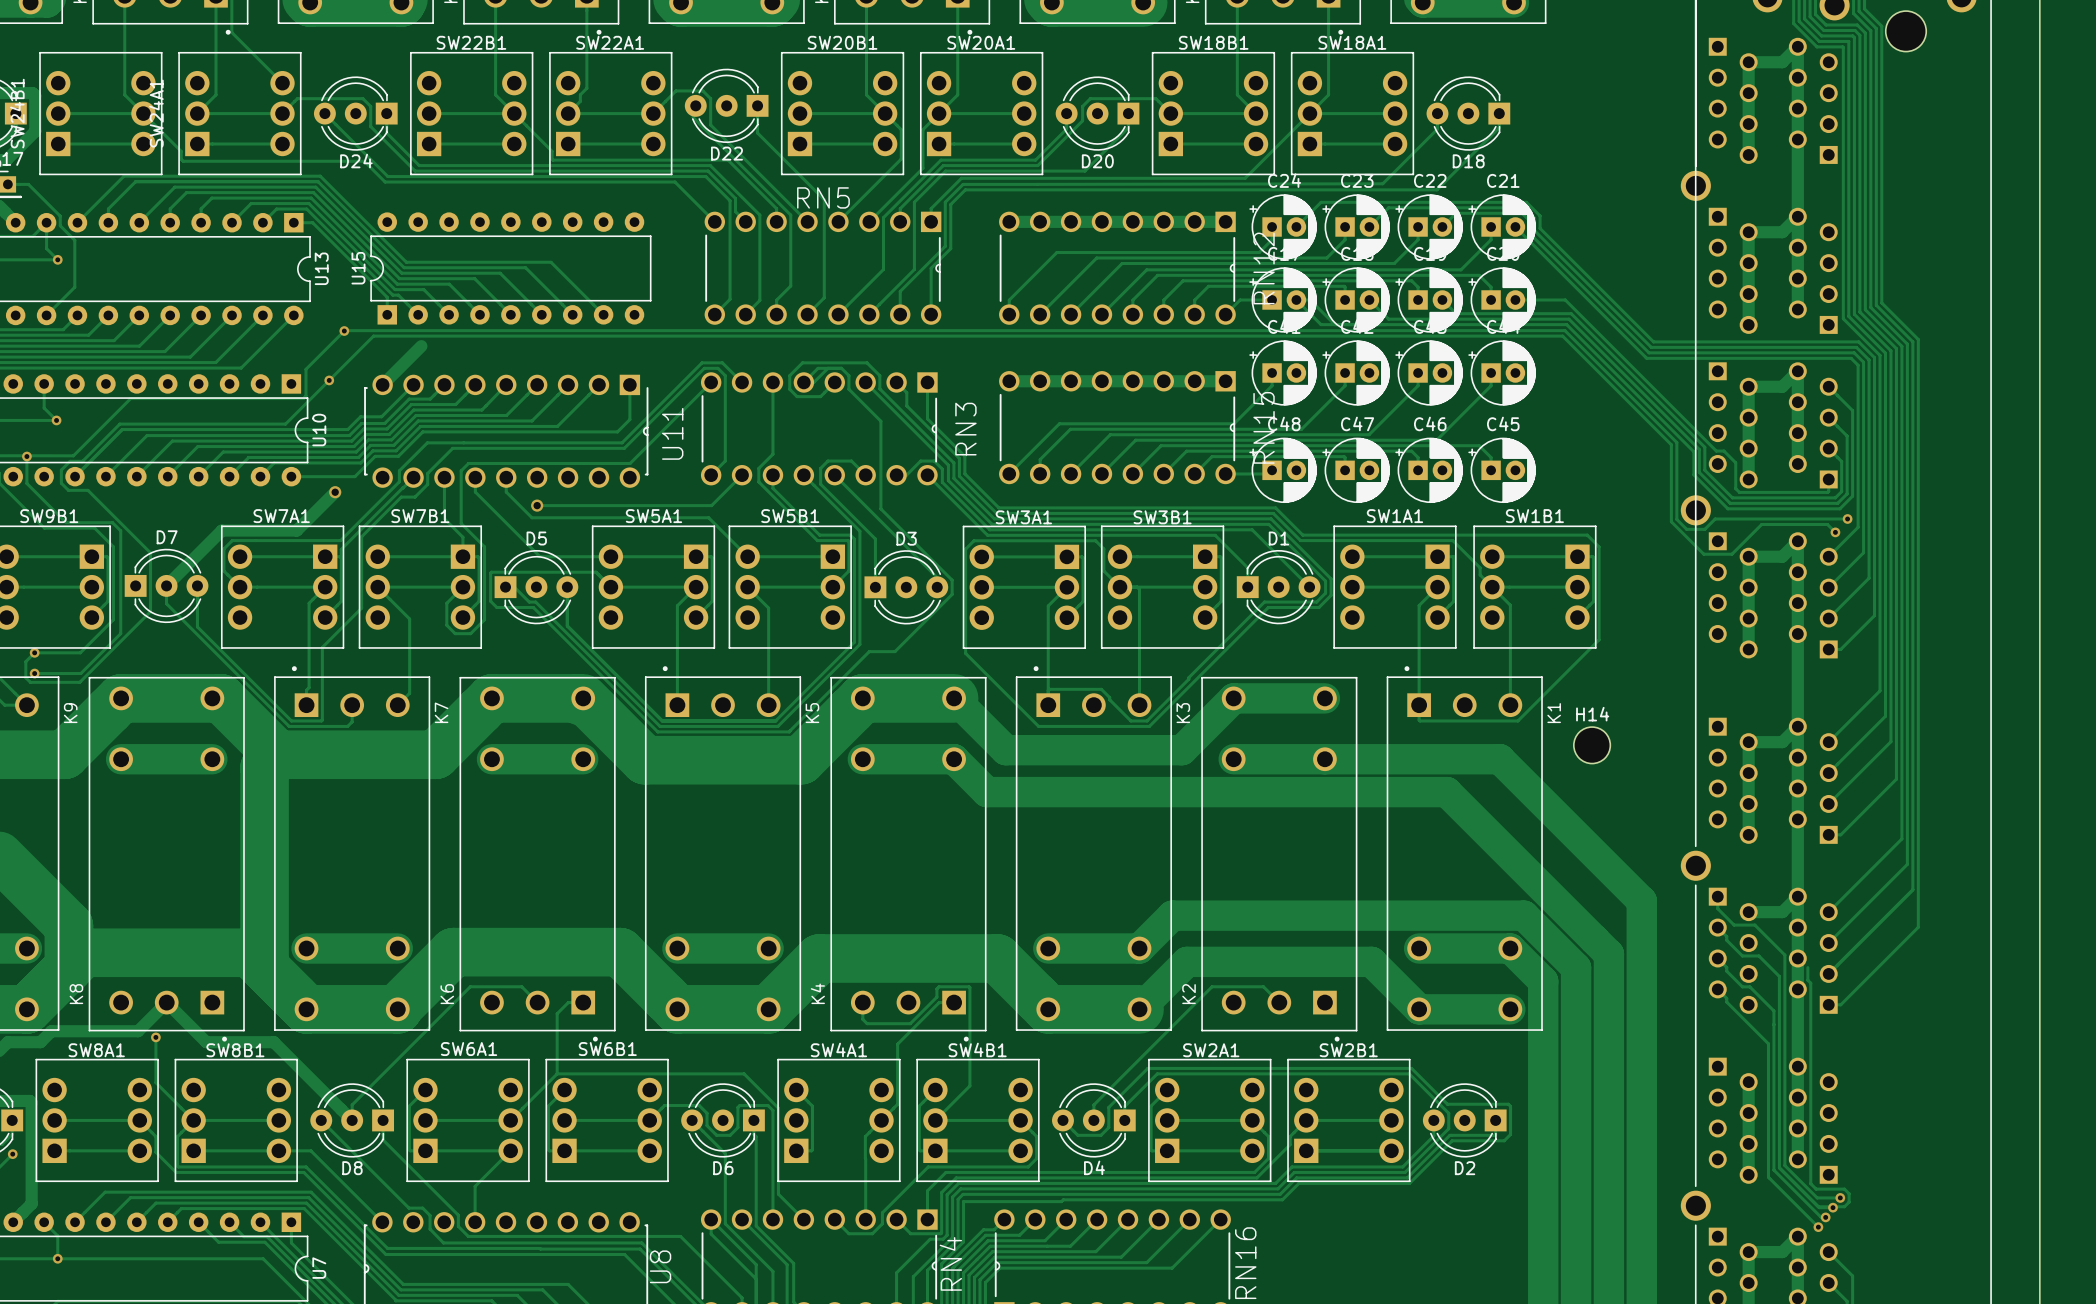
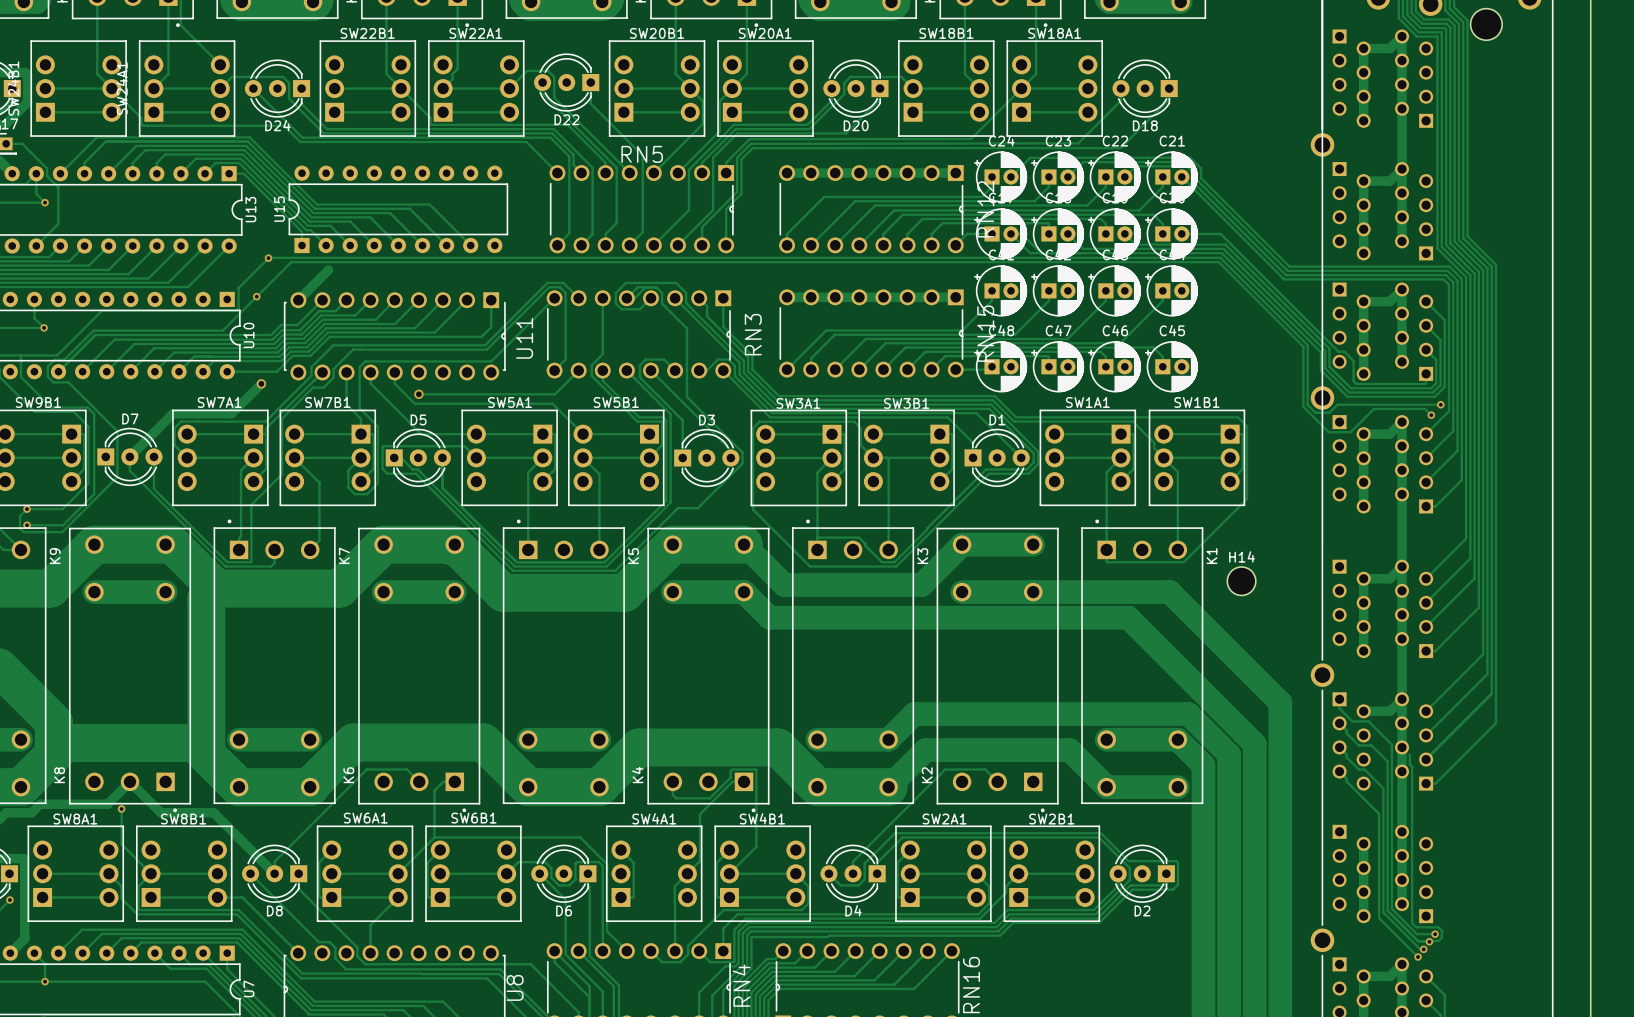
via: (26, 456) -> none

